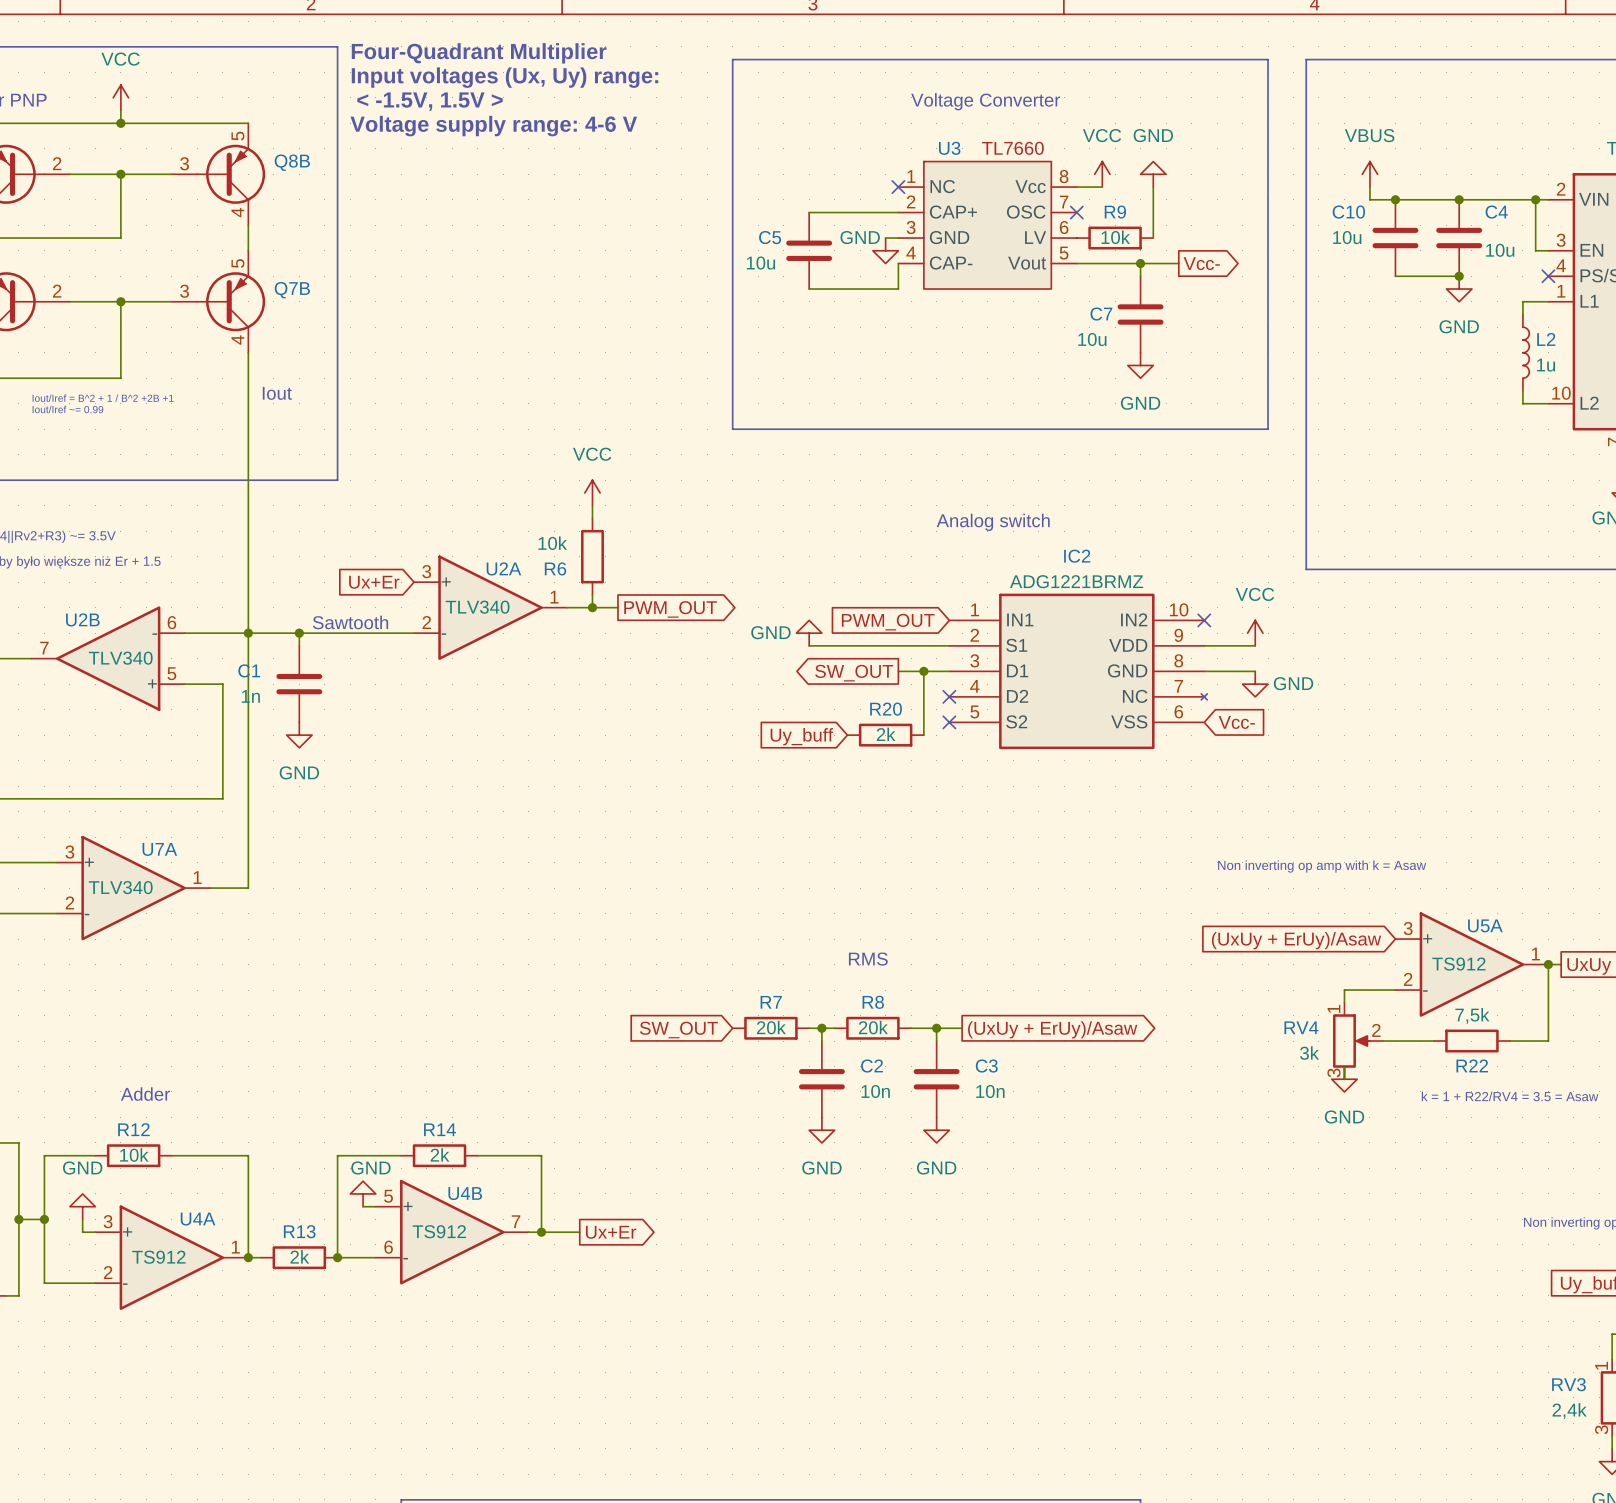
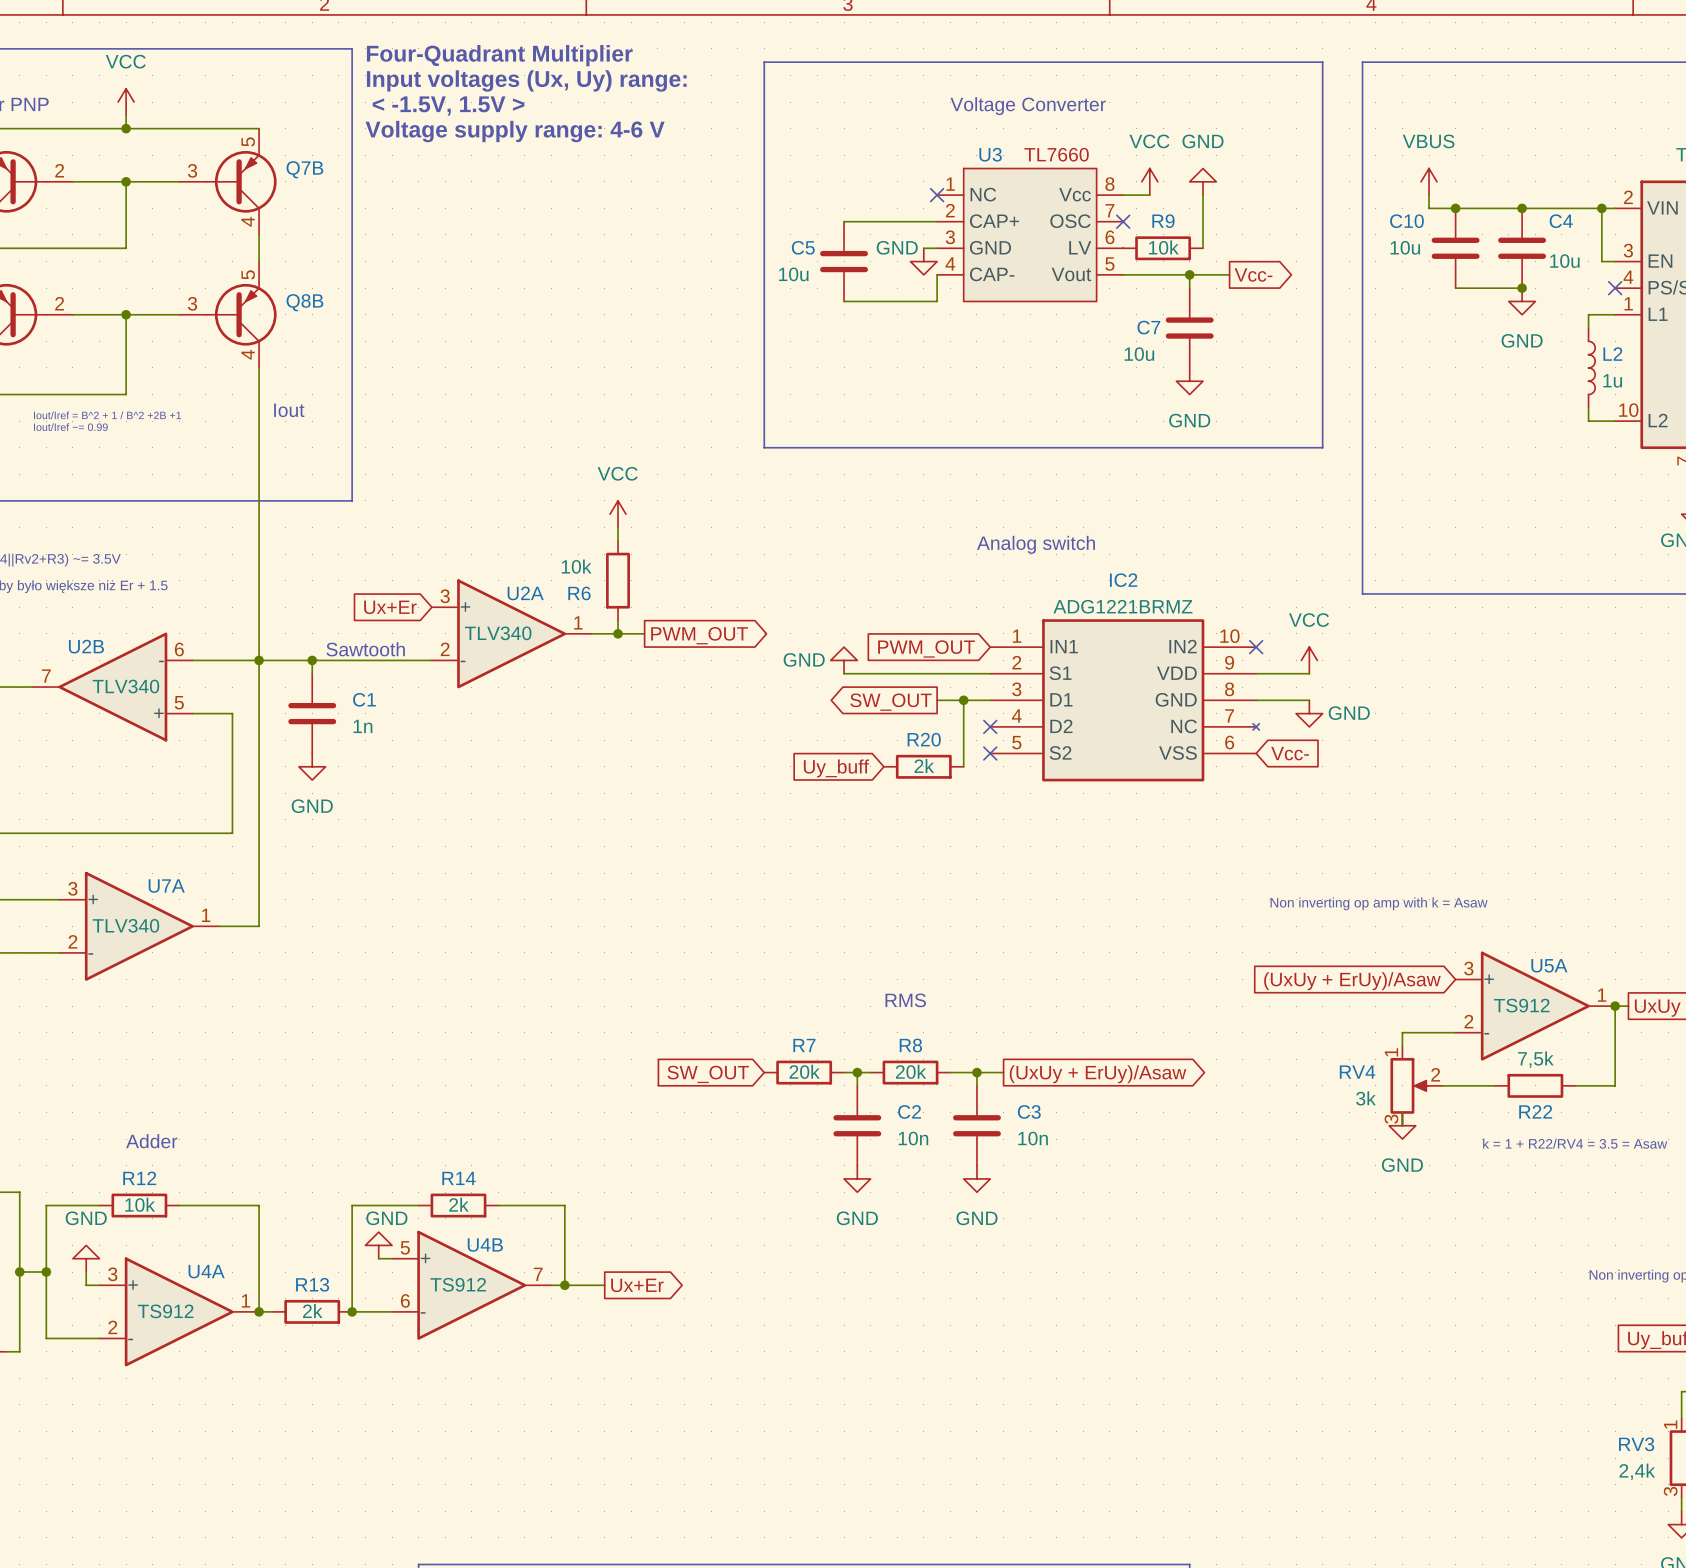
Q8B name: Q8B (292, 162) -> Q7B (304, 169)
Q7B name: Q7B (292, 290) -> Q8B (304, 302)
C1 name position: C1 (249, 670) -> C1 (364, 699)
C1 value position: 1n (250, 696) -> 1n (362, 726)

